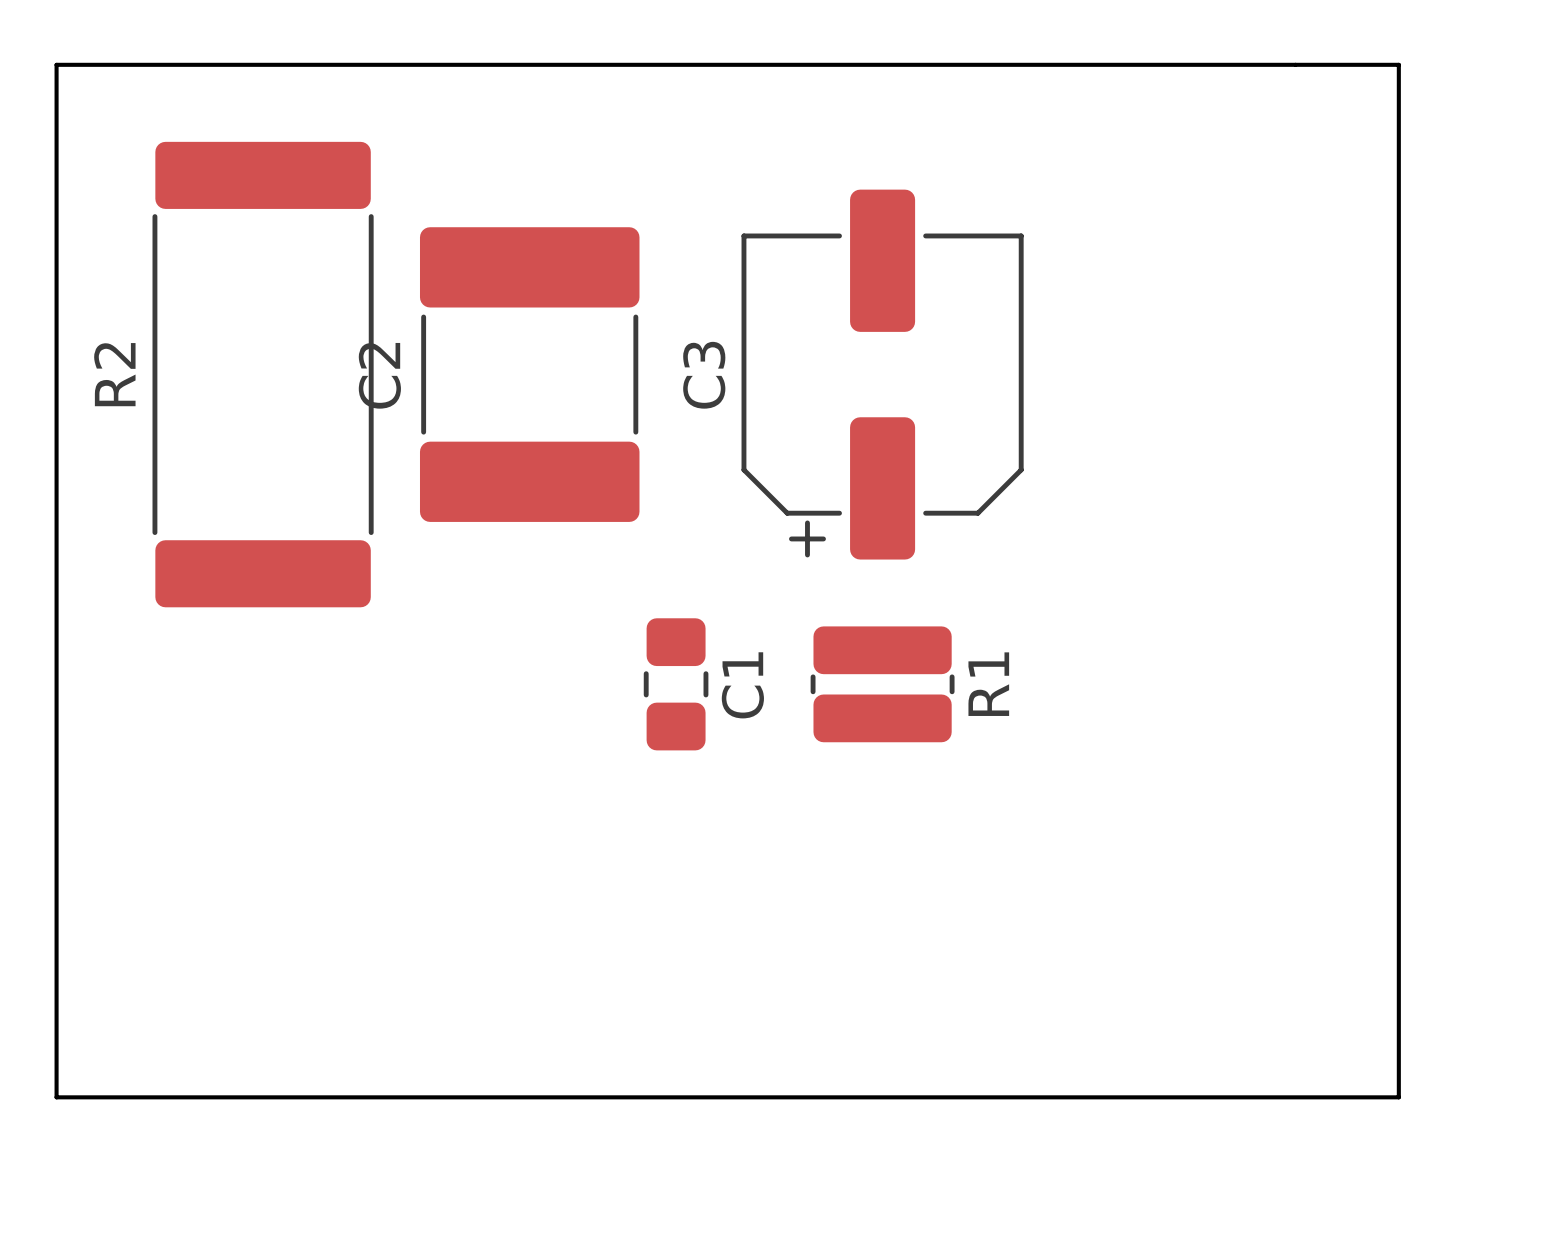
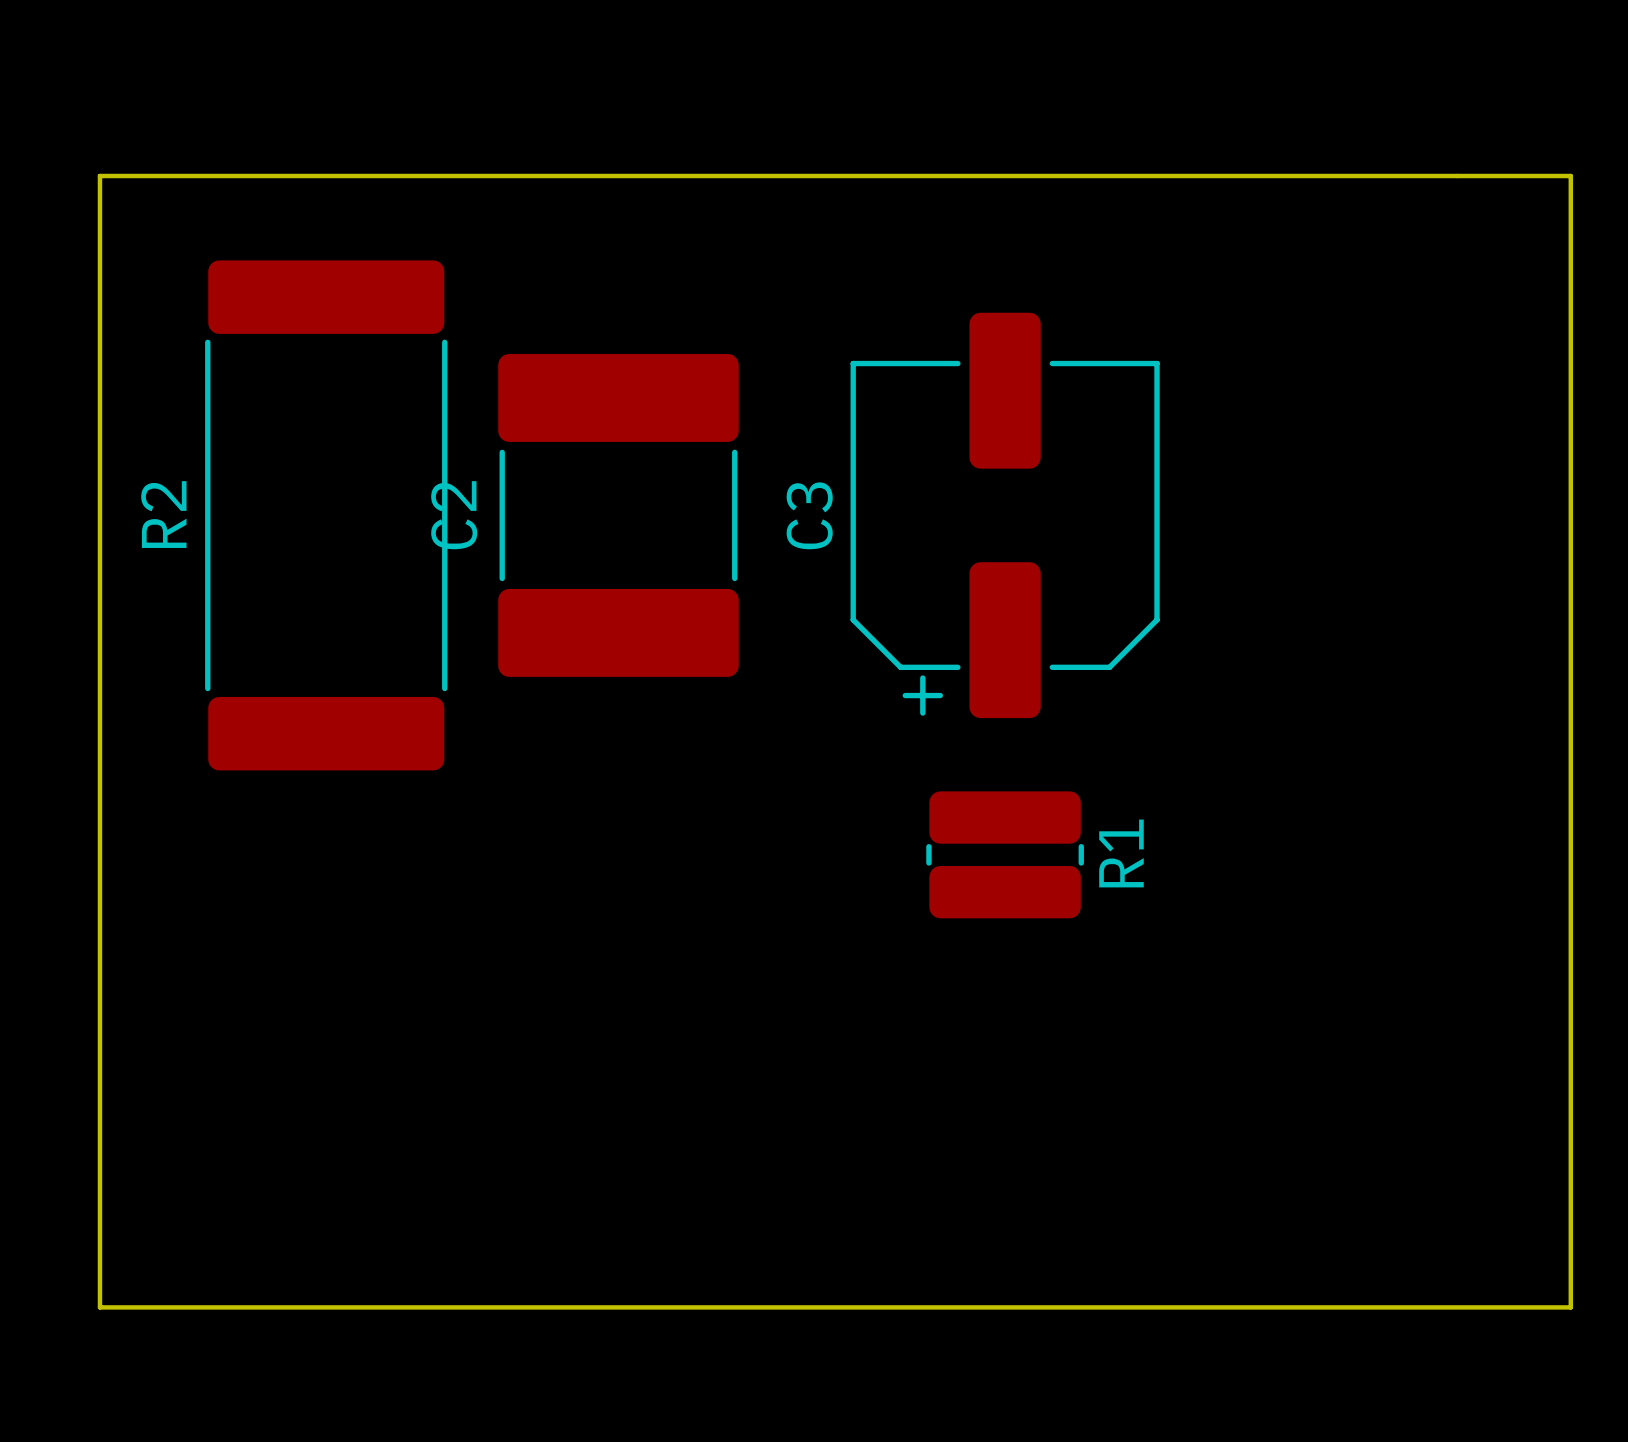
C1: (676, 684) -> none

